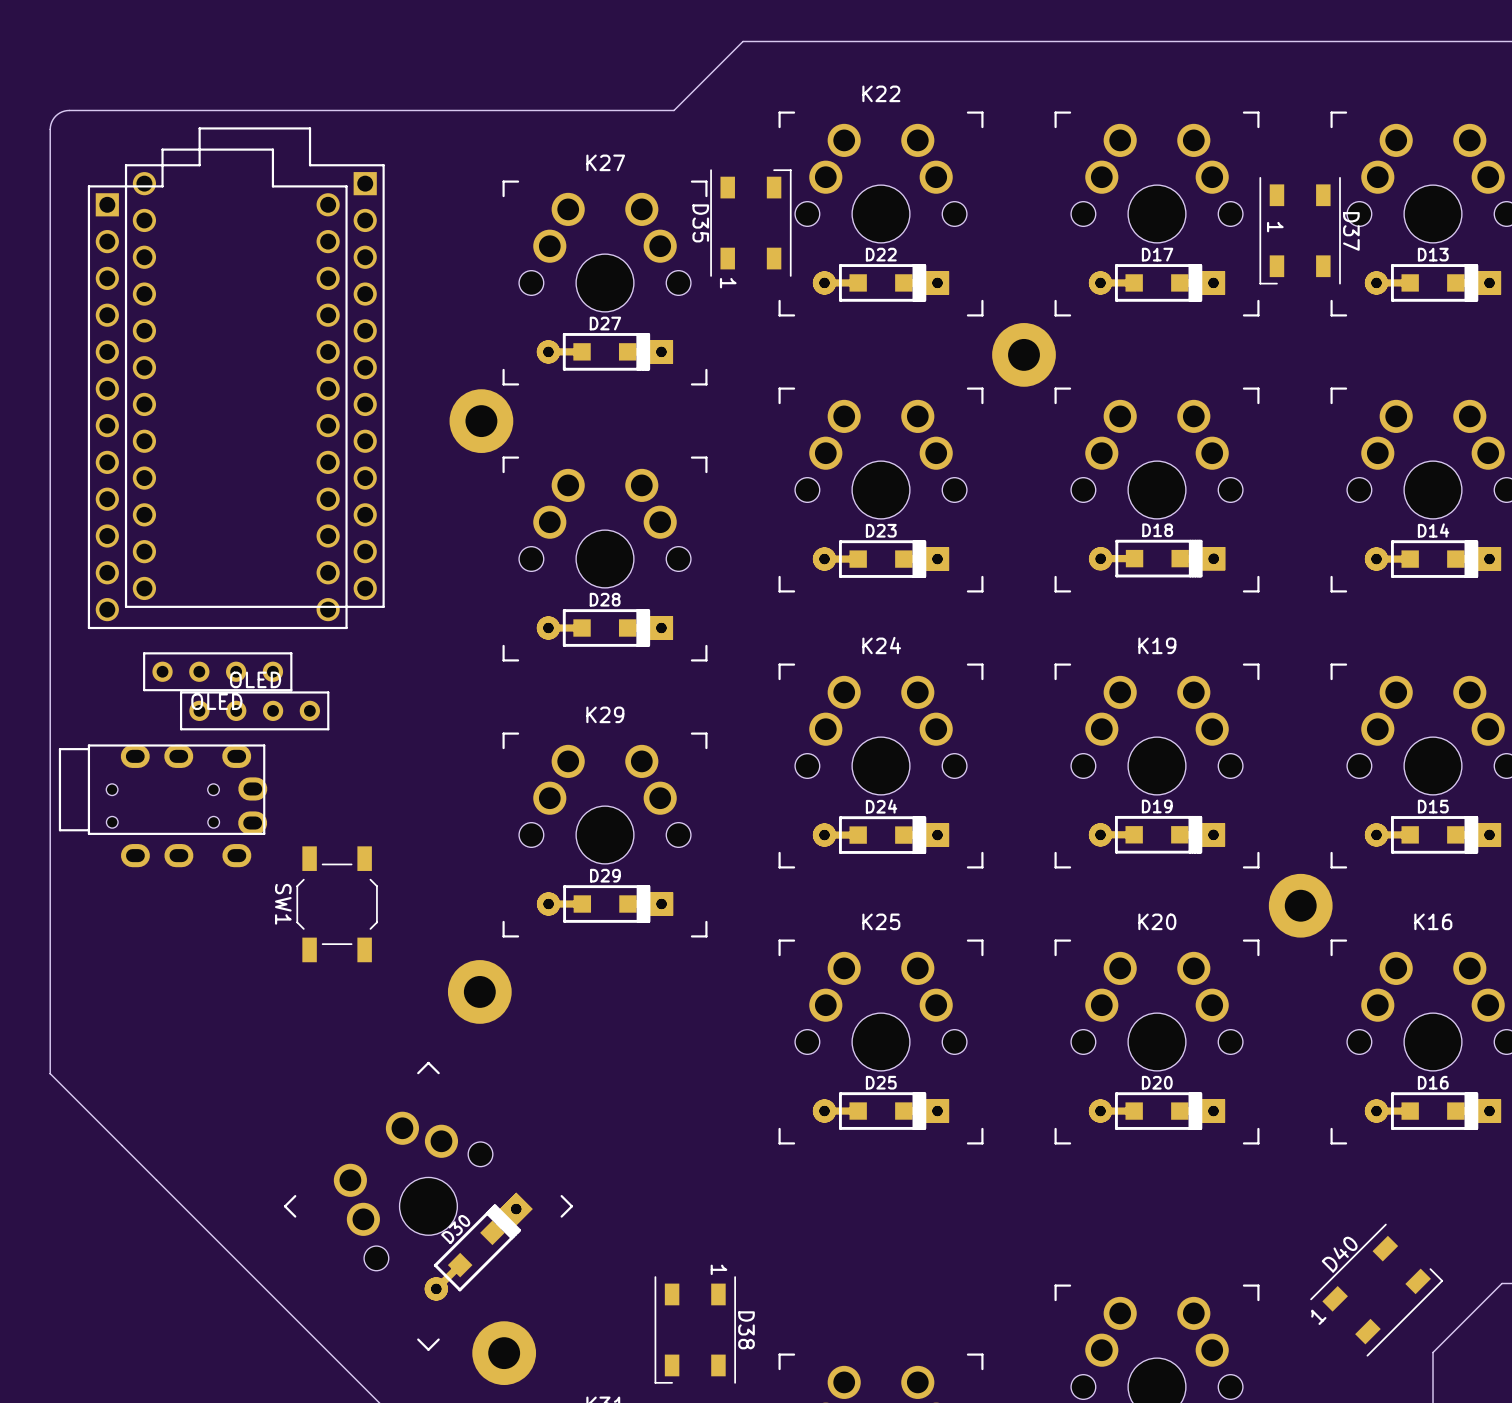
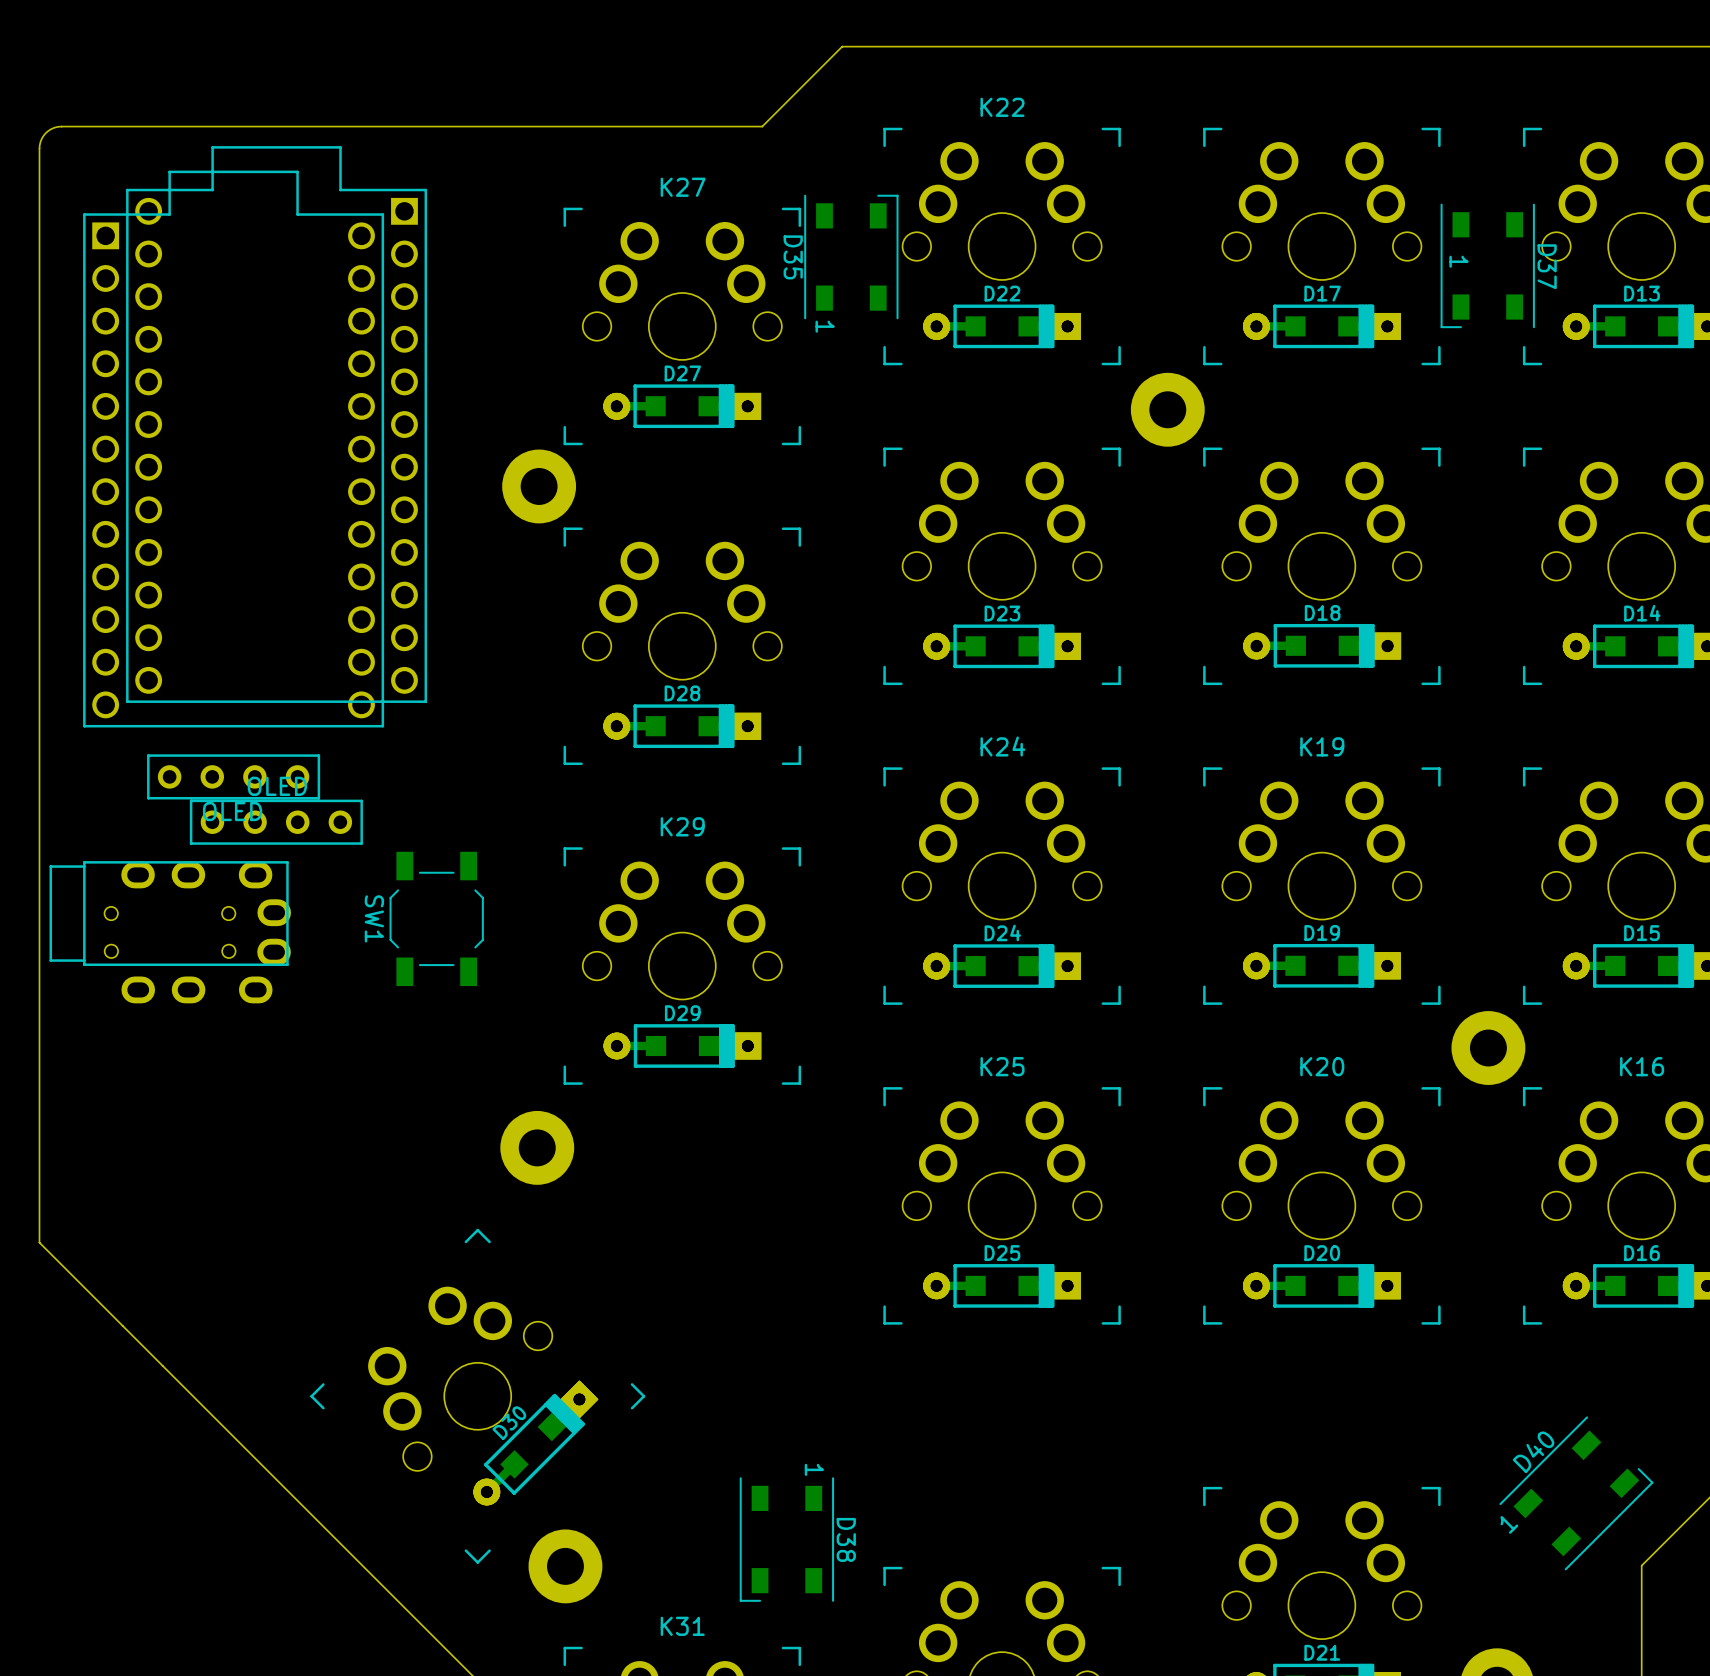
SW1 position: (337, 904) -> (436, 918)

